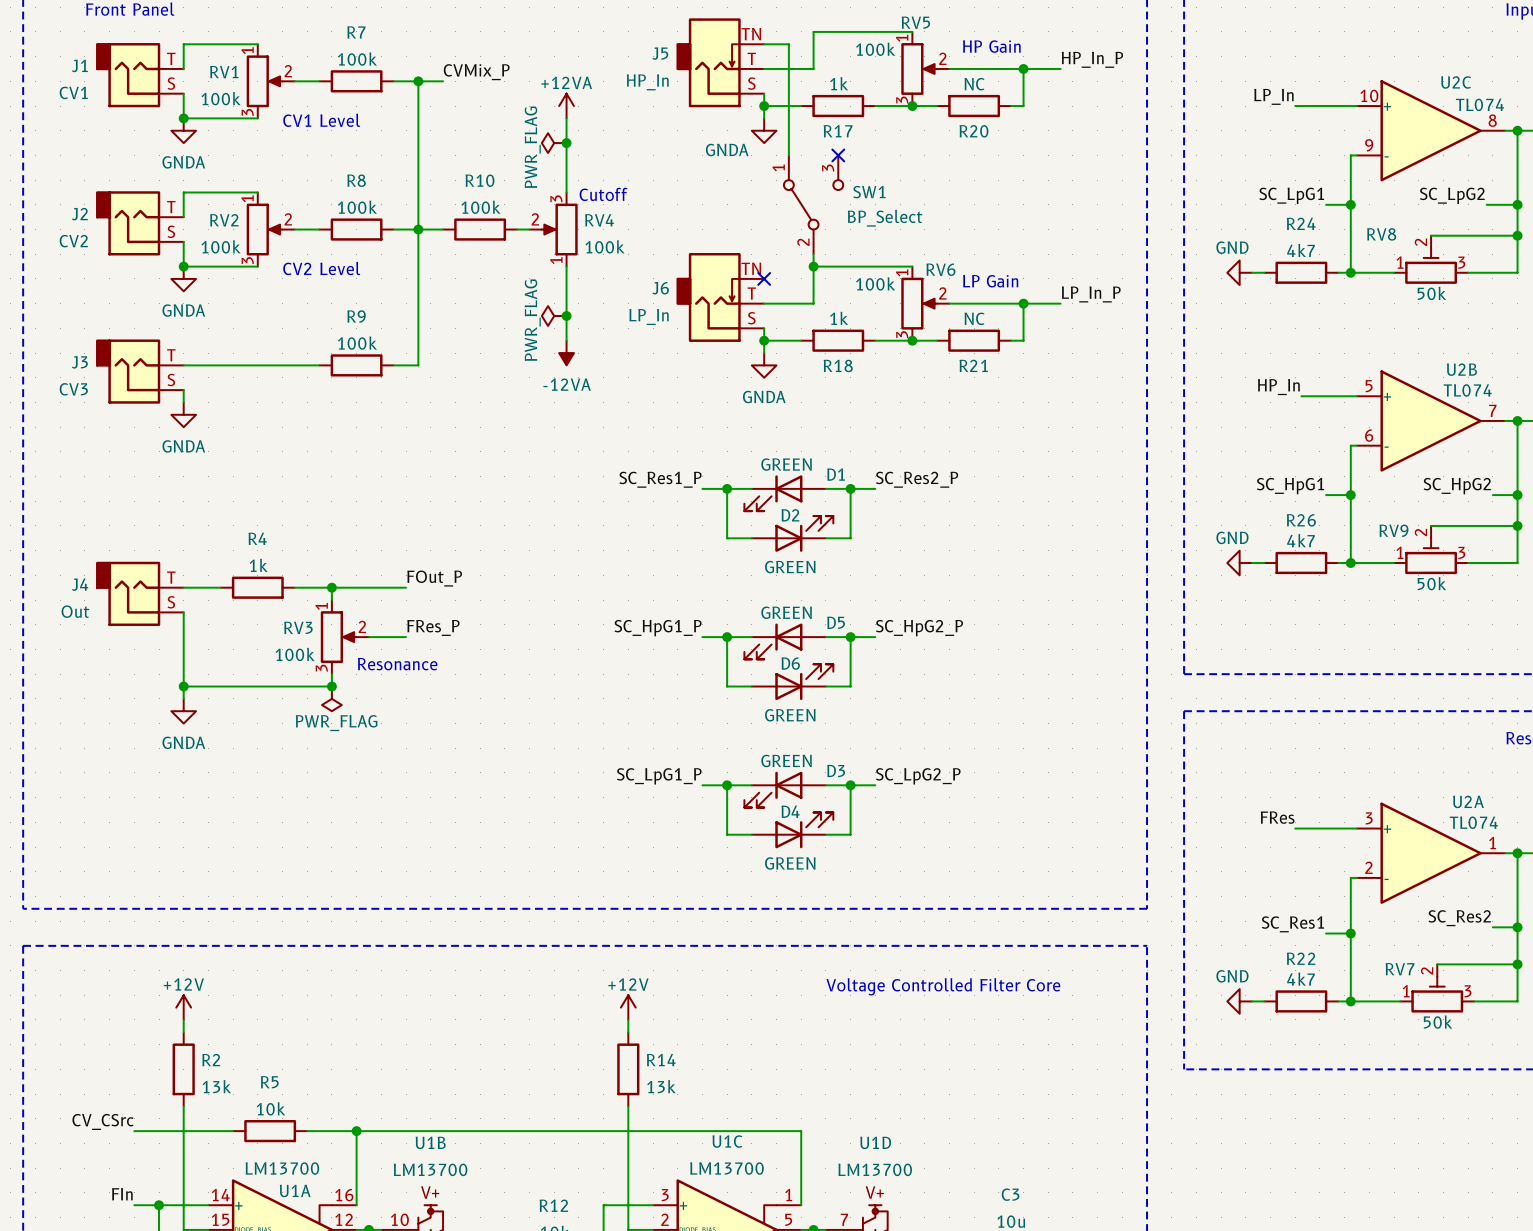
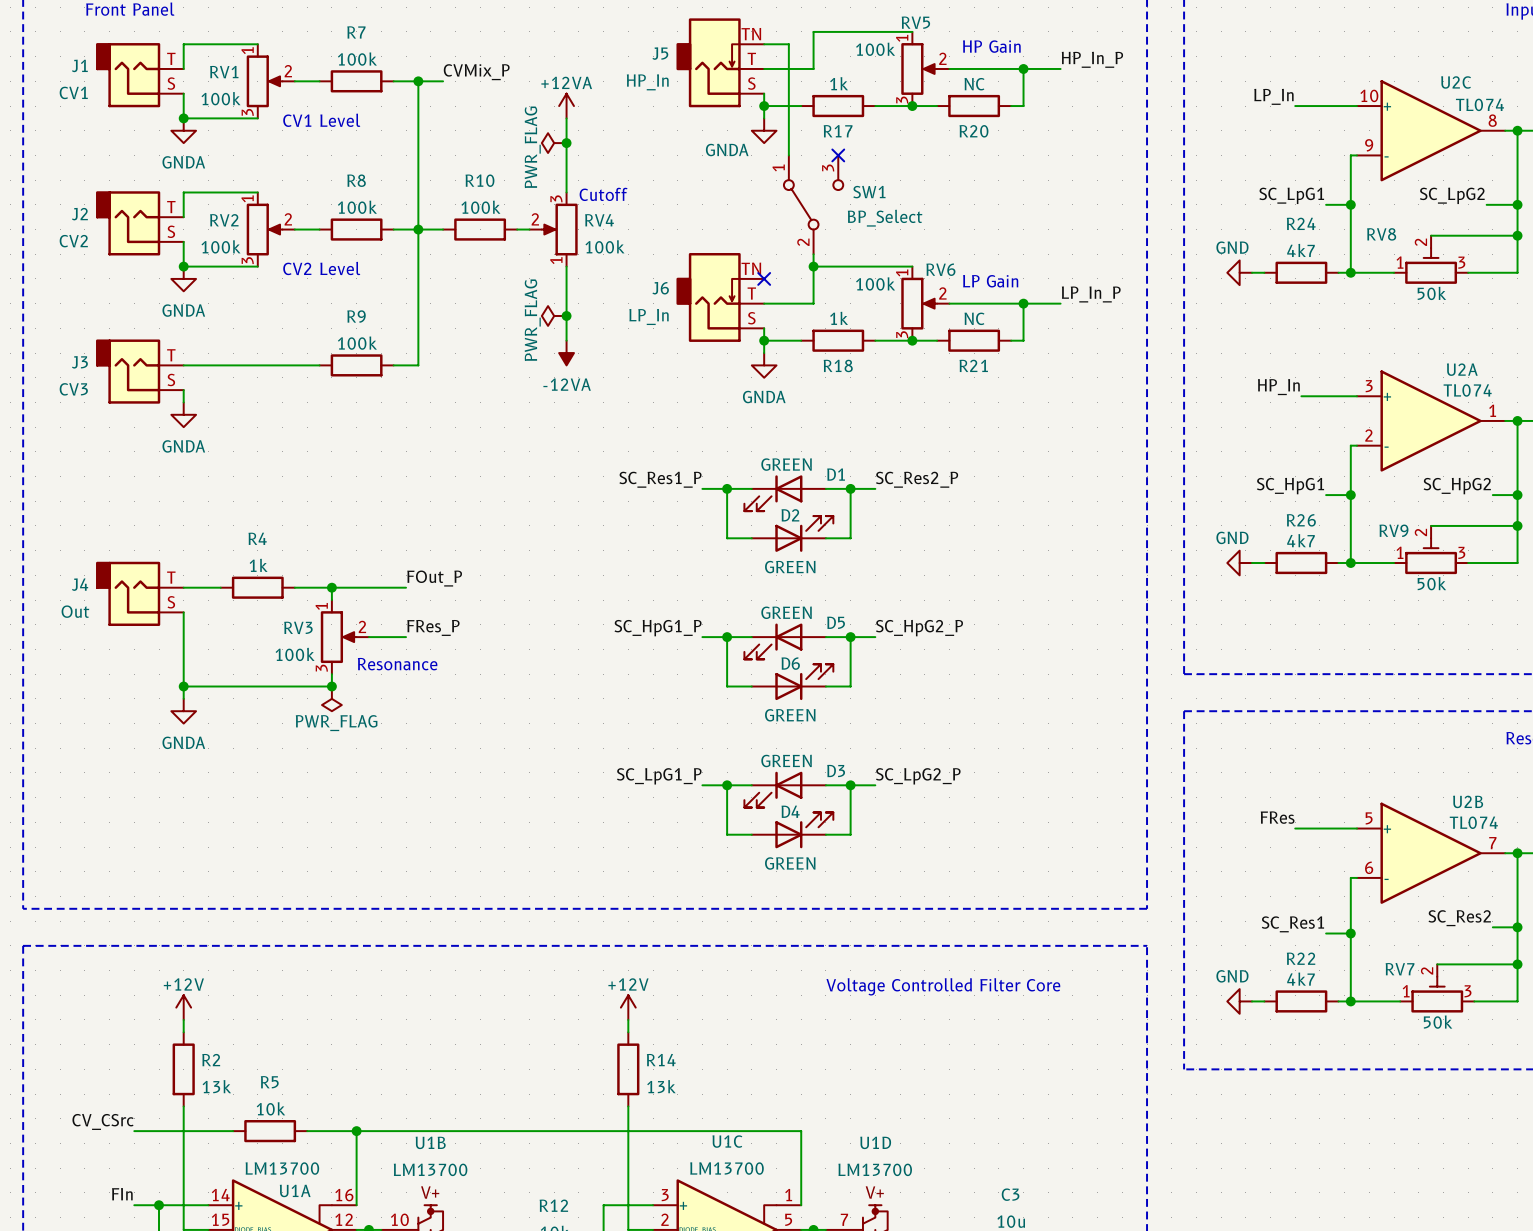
U2B name position: U2B (1461, 369) -> U2B (1468, 801)
U2B position: (1431, 420) -> (1431, 853)
U2A name position: U2A (1468, 801) -> U2A (1462, 369)
U2A position: (1431, 853) -> (1431, 420)

